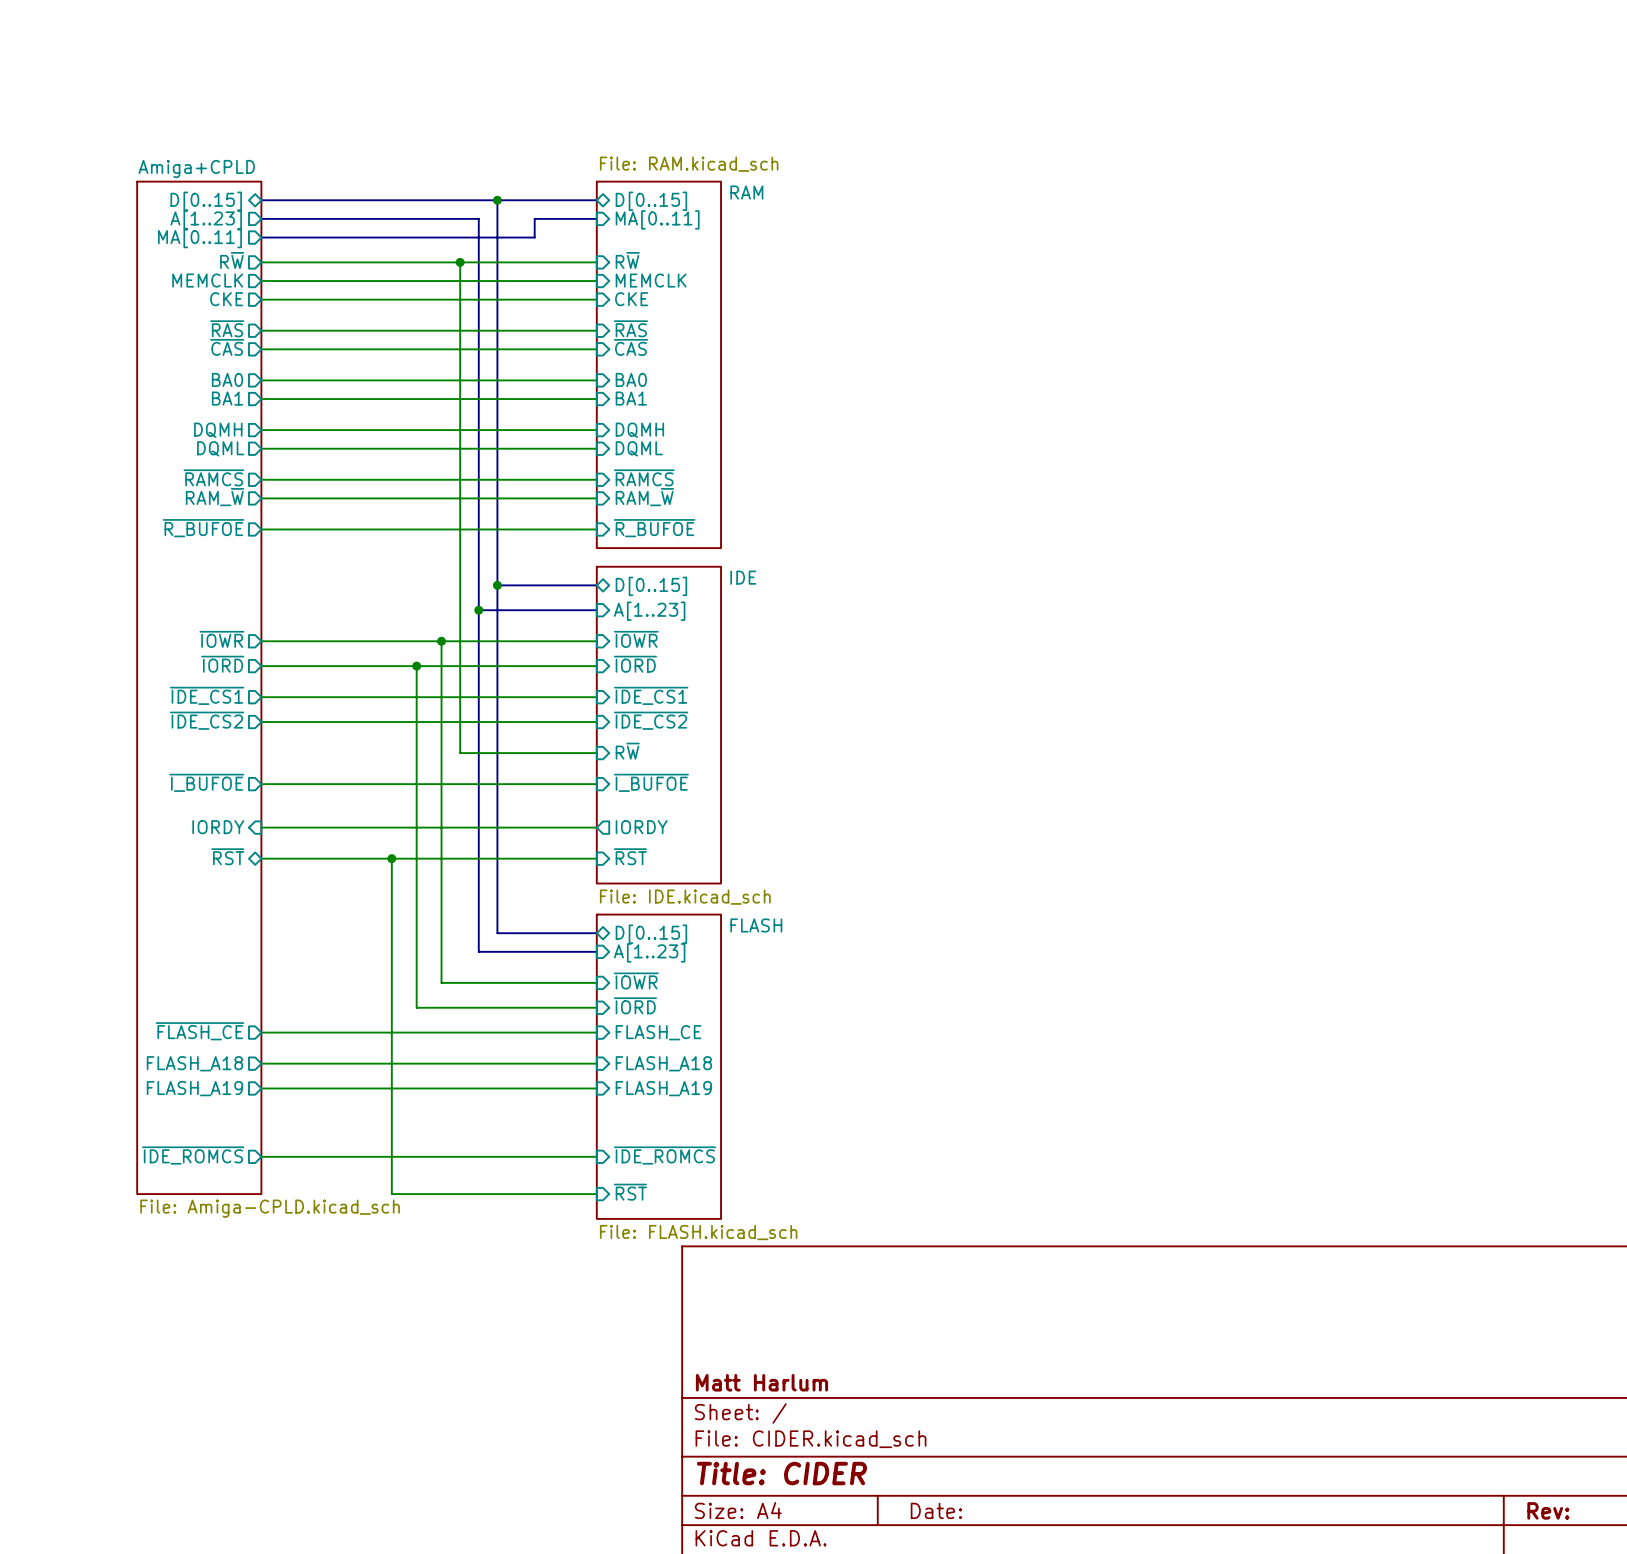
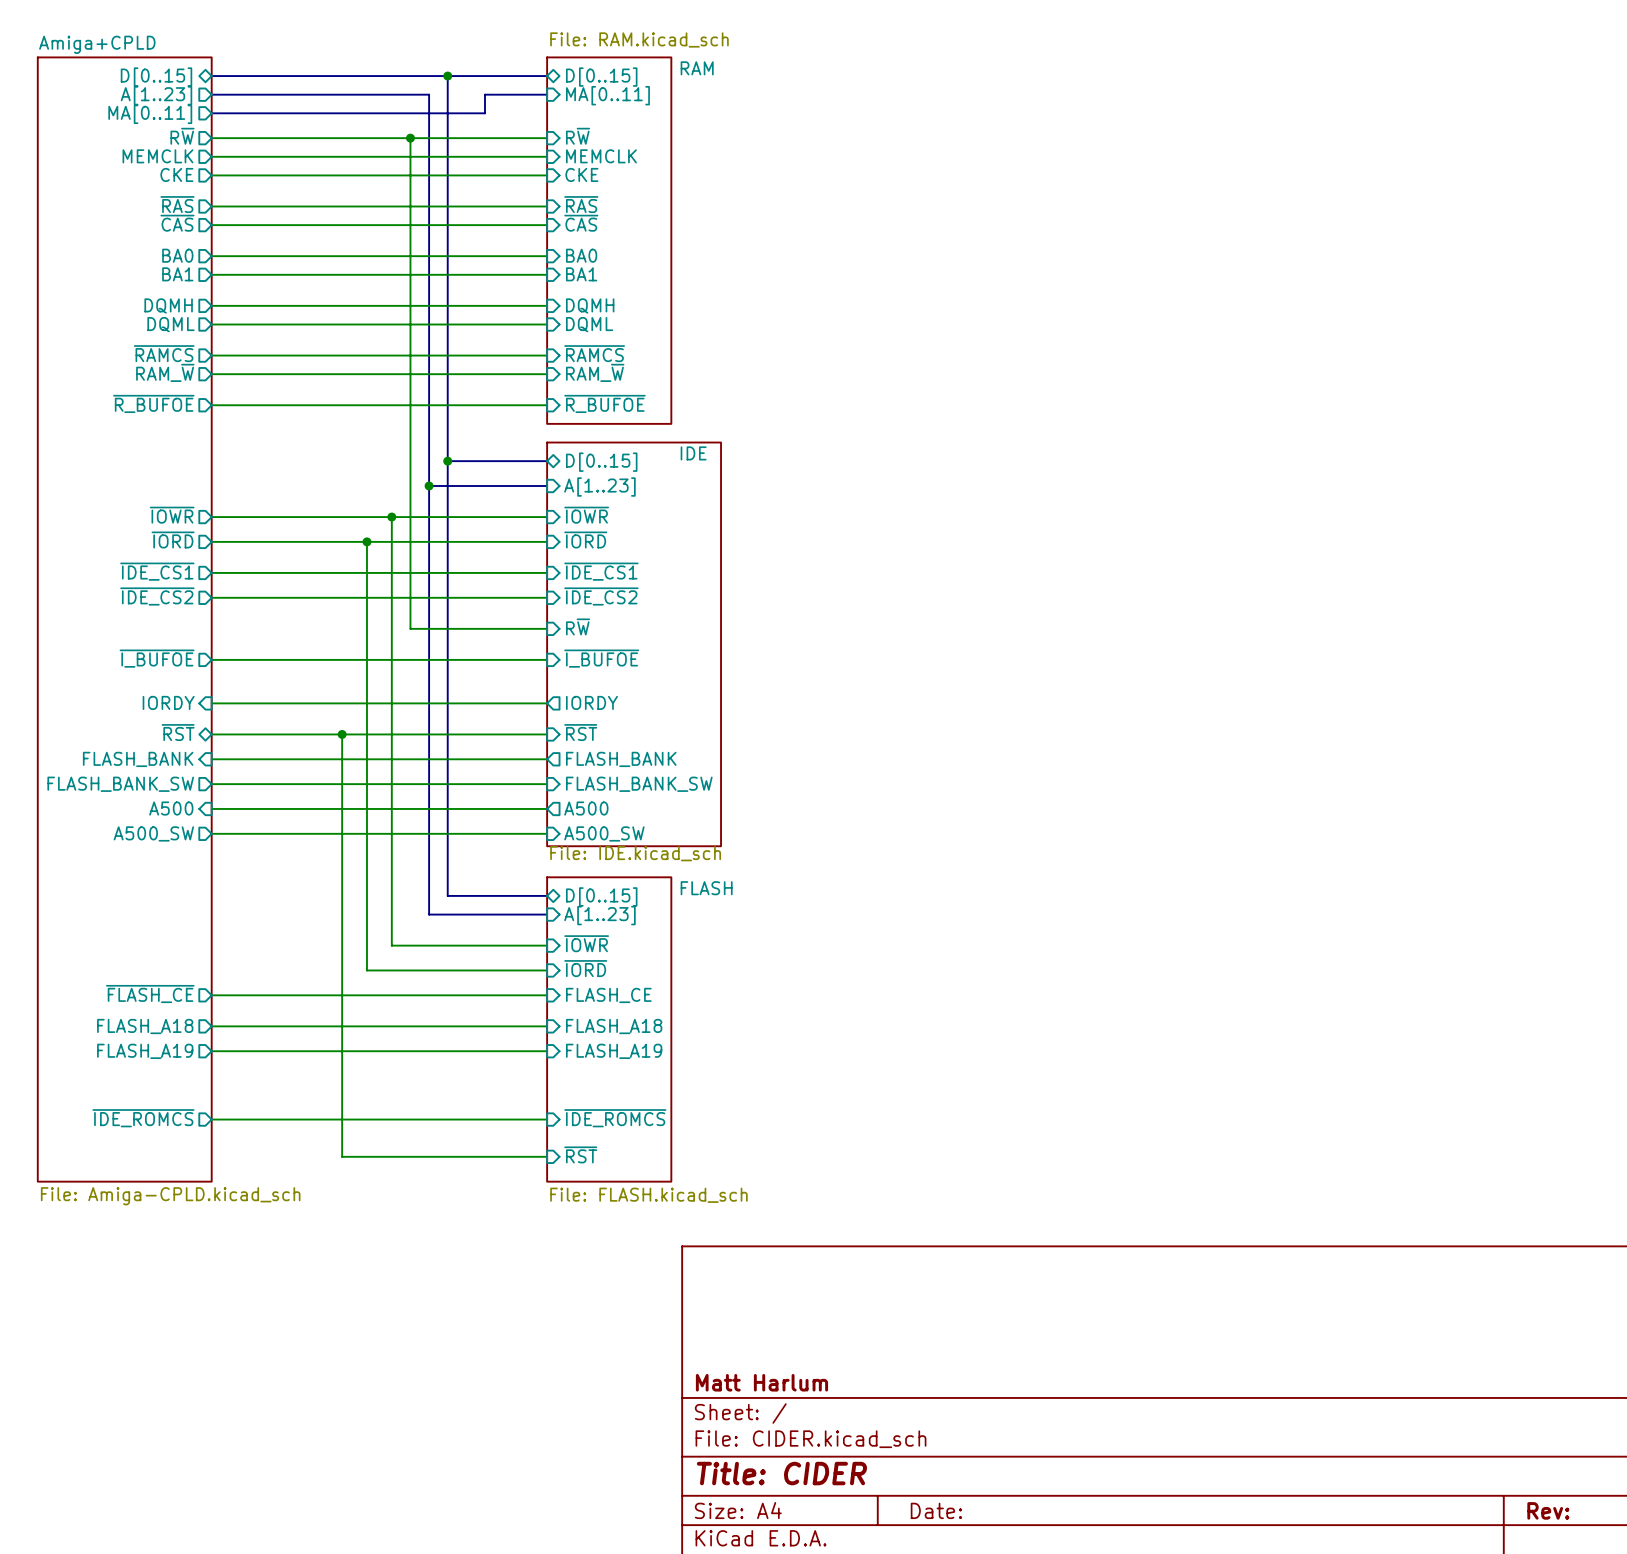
bus: none -> (447, 76) (447, 895) (547, 895)
junction: none -> (447, 76)
sheet pin: none -> D[0..15] (601, 77)
bus: none -> (211, 94) (429, 94) (429, 914) (547, 914)
junction: none -> (410, 138)
bus: (261, 200) (596, 200) -> (211, 76) (547, 76)
bus: (497, 200) (497, 933) (596, 933) -> none
junction: (497, 200) -> none
sheet pin position: D[0..15] (206, 201) -> D[0..15] (156, 77)
sheet pin: D[0..15] (651, 201) -> none
bus: (261, 218) (478, 218) (478, 951) (596, 951) -> none
bus: (596, 218) (534, 218) (534, 237) (261, 237) -> (547, 94) (485, 94) (485, 113) (211, 113)
sheet pin position: A[1..23] (206, 219) -> A[1..23] (156, 95)
sheet pin position: MA[0..11] (657, 219) -> MA[0..11] (607, 95)
sheet pin position: MA[0..11] (199, 238) -> MA[0..11] (150, 114)
sheet pin position: R~{W} (232, 260) -> R~{W} (182, 136)
sheet pin position: R~{W} (627, 260) -> R~{W} (578, 136)
wire: (261, 262) (596, 262) -> (211, 138) (547, 138)
wire: (460, 262) (460, 753) (596, 753) -> (410, 138) (410, 628) (547, 628)
junction: (460, 262) -> none
sheet pin position: MEMCLK (207, 280) -> MEMCLK (157, 156)
sheet pin position: MEMCLK (651, 280) -> MEMCLK (601, 156)
wire: (261, 281) (596, 281) -> (211, 156) (547, 156)
sheet pin position: CKE (226, 299) -> CKE (176, 174)
wire: (261, 299) (596, 299) -> (211, 175) (547, 175)
sheet pin position: CKE (631, 299) -> CKE (581, 174)
sheet pin position: ~{RAS} (227, 328) -> ~{RAS} (177, 204)
sheet pin position: ~{RAS} (631, 328) -> ~{RAS} (581, 204)
wire: (261, 330) (596, 330) -> (211, 206) (547, 206)
sheet pin position: ~{CAS} (227, 347) -> ~{CAS} (177, 223)
sheet pin position: ~{CAS} (631, 347) -> ~{CAS} (581, 223)
wire: (261, 349) (596, 349) -> (211, 225) (547, 225)
sheet RAM position: (658, 364) -> (609, 240)
sheet pin position: BA0 (227, 379) -> BA0 (177, 255)
sheet pin position: BA0 (631, 379) -> BA0 (581, 255)
wire: (261, 380) (596, 380) -> (211, 256) (547, 256)
sheet pin position: BA1 (227, 398) -> BA1 (177, 274)
sheet pin position: BA1 (631, 398) -> BA1 (581, 274)
wire: (261, 399) (596, 399) -> (211, 274) (547, 274)
sheet pin position: DQMH (218, 430) -> DQMH (168, 305)
wire: (261, 430) (596, 430) -> (211, 305) (547, 305)
sheet pin position: DQMH (639, 430) -> DQMH (590, 305)
sheet pin position: DQML (220, 448) -> DQML (170, 324)
wire: (261, 448) (596, 448) -> (211, 324) (547, 324)
sheet pin position: DQML (639, 448) -> DQML (589, 324)
junction: none -> (447, 461)
sheet pin: none -> D[0..15] (601, 462)
sheet pin position: ~{RAMCS} (213, 477) -> ~{RAMCS} (164, 353)
sheet pin position: ~{RAMCS} (644, 477) -> ~{RAMCS} (594, 353)
wire: (261, 479) (596, 479) -> (211, 355) (547, 355)
junction: none -> (429, 485)
sheet pin position: RAM_~{W} (215, 497) -> RAM_~{W} (165, 372)
sheet pin position: RAM_~{W} (644, 497) -> RAM_~{W} (595, 372)
wire: (261, 498) (596, 498) -> (211, 374) (547, 374)
wire: none -> (391, 517) (391, 858)
junction: none -> (391, 517)
sheet pin position: ~{R_BUFOE} (203, 528) -> ~{R_BUFOE} (153, 403)
sheet pin position: ~{R_BUFOE} (654, 528) -> ~{R_BUFOE} (604, 403)
wire: (261, 529) (596, 529) -> (211, 405) (547, 405)
wire: none -> (366, 541) (366, 970) (547, 970)
junction: none -> (366, 541)
bus: (497, 585) (596, 585) -> (447, 461) (547, 461)
junction: (497, 585) -> none
sheet pin: D[0..15] (651, 586) -> none
bus: (478, 610) (596, 610) -> (429, 485) (547, 485)
junction: (478, 610) -> none
sheet pin position: A[1..23] (649, 611) -> A[1..23] (599, 487)
sheet Amiga+CPLD: none -> File: Amiga-CPLD.kicad_sch (124, 619)
sheet pin position: ~{IOWR} (221, 639) -> ~{IOWR} (172, 515)
sheet pin position: ~{IOWR} (636, 639) -> ~{IOWR} (586, 515)
wire: (261, 641) (596, 641) -> (211, 517) (547, 517)
wire: (441, 641) (441, 982) (596, 982) -> none
junction: (441, 641) -> none
sheet IDE: none -> File: IDE.kicad_sch (634, 644)
wire: none -> (211, 659) (547, 659)
sheet pin position: ~{IORD} (222, 664) -> ~{IORD} (173, 540)
sheet pin position: ~{IORD} (635, 664) -> ~{IORD} (585, 540)
wire: (261, 666) (596, 666) -> (211, 541) (547, 541)
wire: (416, 666) (416, 1007) (596, 1007) -> none
junction: (416, 666) -> none
sheet Amiga+CPLD: File: Amiga-CPLD.kicad_sch (199, 687) -> none
sheet pin position: ~{IDE_CS1} (207, 695) -> ~{IDE_CS1} (157, 571)
sheet pin position: ~{IDE_CS1} (651, 695) -> ~{IDE_CS1} (601, 571)
wire: (261, 697) (596, 697) -> (211, 572) (547, 572)
sheet pin position: ~{IDE_CS2} (207, 720) -> ~{IDE_CS2} (157, 596)
sheet pin position: ~{IDE_CS2} (651, 720) -> ~{IDE_CS2} (601, 596)
wire: (261, 722) (596, 722) -> (211, 597) (547, 597)
sheet IDE: File: IDE.kicad_sch (658, 725) -> none
junction: none -> (342, 734)
sheet pin position: R~{W} (627, 751) -> R~{W} (578, 626)
sheet pin: none -> FLASH_BANK (138, 759)
wire: none -> (211, 759) (547, 759)
sheet pin: none -> FLASH_BANK (621, 759)
sheet pin position: ~{I_BUFOE} (206, 782) -> ~{I_BUFOE} (157, 658)
sheet pin position: ~{I_BUFOE} (651, 782) -> ~{I_BUFOE} (601, 658)
sheet pin: none -> FLASH_BANK_SW (120, 784)
wire: none -> (211, 784) (261, 784)
wire: (547, 784) (596, 784) -> none
sheet pin: none -> FLASH_BANK_SW (639, 784)
sheet pin: none -> A500 (171, 808)
sheet pin: none -> A500 (586, 808)
sheet pin position: IORDY (218, 827) -> IORDY (168, 702)
wire: (261, 827) (596, 827) -> (211, 703) (547, 703)
sheet pin position: IORDY (641, 827) -> IORDY (591, 702)
sheet pin: none -> A500_SW (153, 833)
wire: none -> (211, 833) (547, 833)
sheet pin: none -> A500_SW (604, 833)
sheet pin position: ~{RST} (227, 856) -> ~{RST} (178, 732)
sheet pin position: ~{RST} (630, 856) -> ~{RST} (580, 732)
wire: (261, 858) (596, 858) -> (211, 734) (547, 734)
junction: (391, 858) -> none
sheet pin position: D[0..15] (651, 934) -> D[0..15] (601, 896)
wire: (391, 945) (391, 1194) (596, 1194) -> (391, 945) (547, 945)
sheet pin position: A[1..23] (649, 952) -> A[1..23] (599, 915)
sheet pin position: ~{IOWR} (636, 981) -> ~{IOWR} (586, 943)
sheet pin position: ~{IORD} (635, 1005) -> ~{IORD} (585, 968)
sheet pin position: ~{FLASH_CE} (199, 1031) -> ~{FLASH_CE} (150, 994)
wire: (261, 1032) (596, 1032) -> (211, 808) (547, 808)
sheet pin position: FLASH_CE (658, 1032) -> FLASH_CE (608, 995)
wire: none -> (211, 1051) (547, 1051)
sheet pin position: FLASH_A18 (194, 1063) -> FLASH_A18 (145, 1026)
wire: (261, 1063) (596, 1063) -> (211, 1026) (547, 1026)
sheet pin position: FLASH_A18 (663, 1063) -> FLASH_A18 (614, 1026)
sheet FLASH position: (658, 1066) -> (609, 1029)
sheet pin position: FLASH_A19 (194, 1088) -> FLASH_A19 (145, 1051)
wire: (261, 1088) (596, 1088) -> (211, 995) (547, 995)
sheet pin position: FLASH_A19 (663, 1088) -> FLASH_A19 (614, 1051)
wire: none -> (211, 1119) (547, 1119)
sheet pin position: ~{IDE_ROMCS} (193, 1155) -> ~{IDE_ROMCS} (143, 1118)
sheet pin position: ~{IDE_ROMCS} (665, 1155) -> ~{IDE_ROMCS} (615, 1118)
wire: (261, 1156) (342, 1156) -> (342, 734) (342, 1156)
wire: (547, 1156) (596, 1156) -> none
sheet pin position: ~{RST} (630, 1192) -> ~{RST} (580, 1154)

